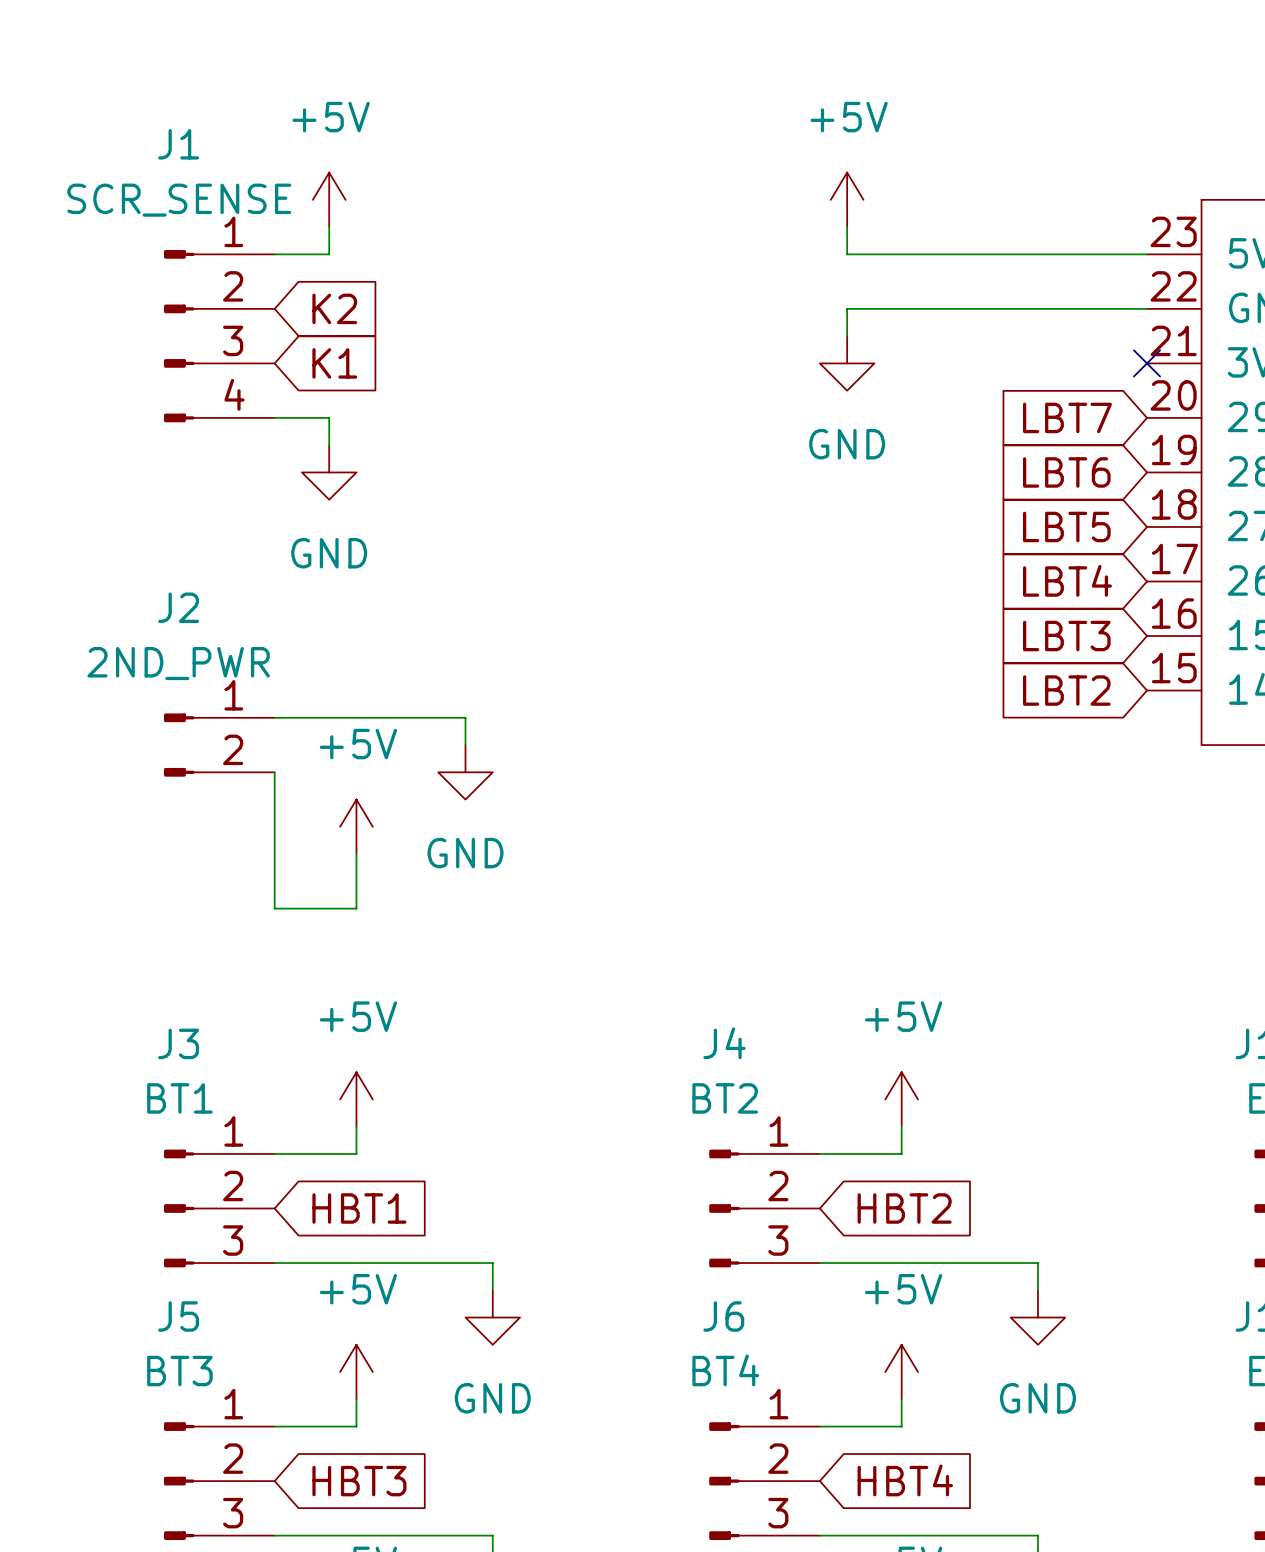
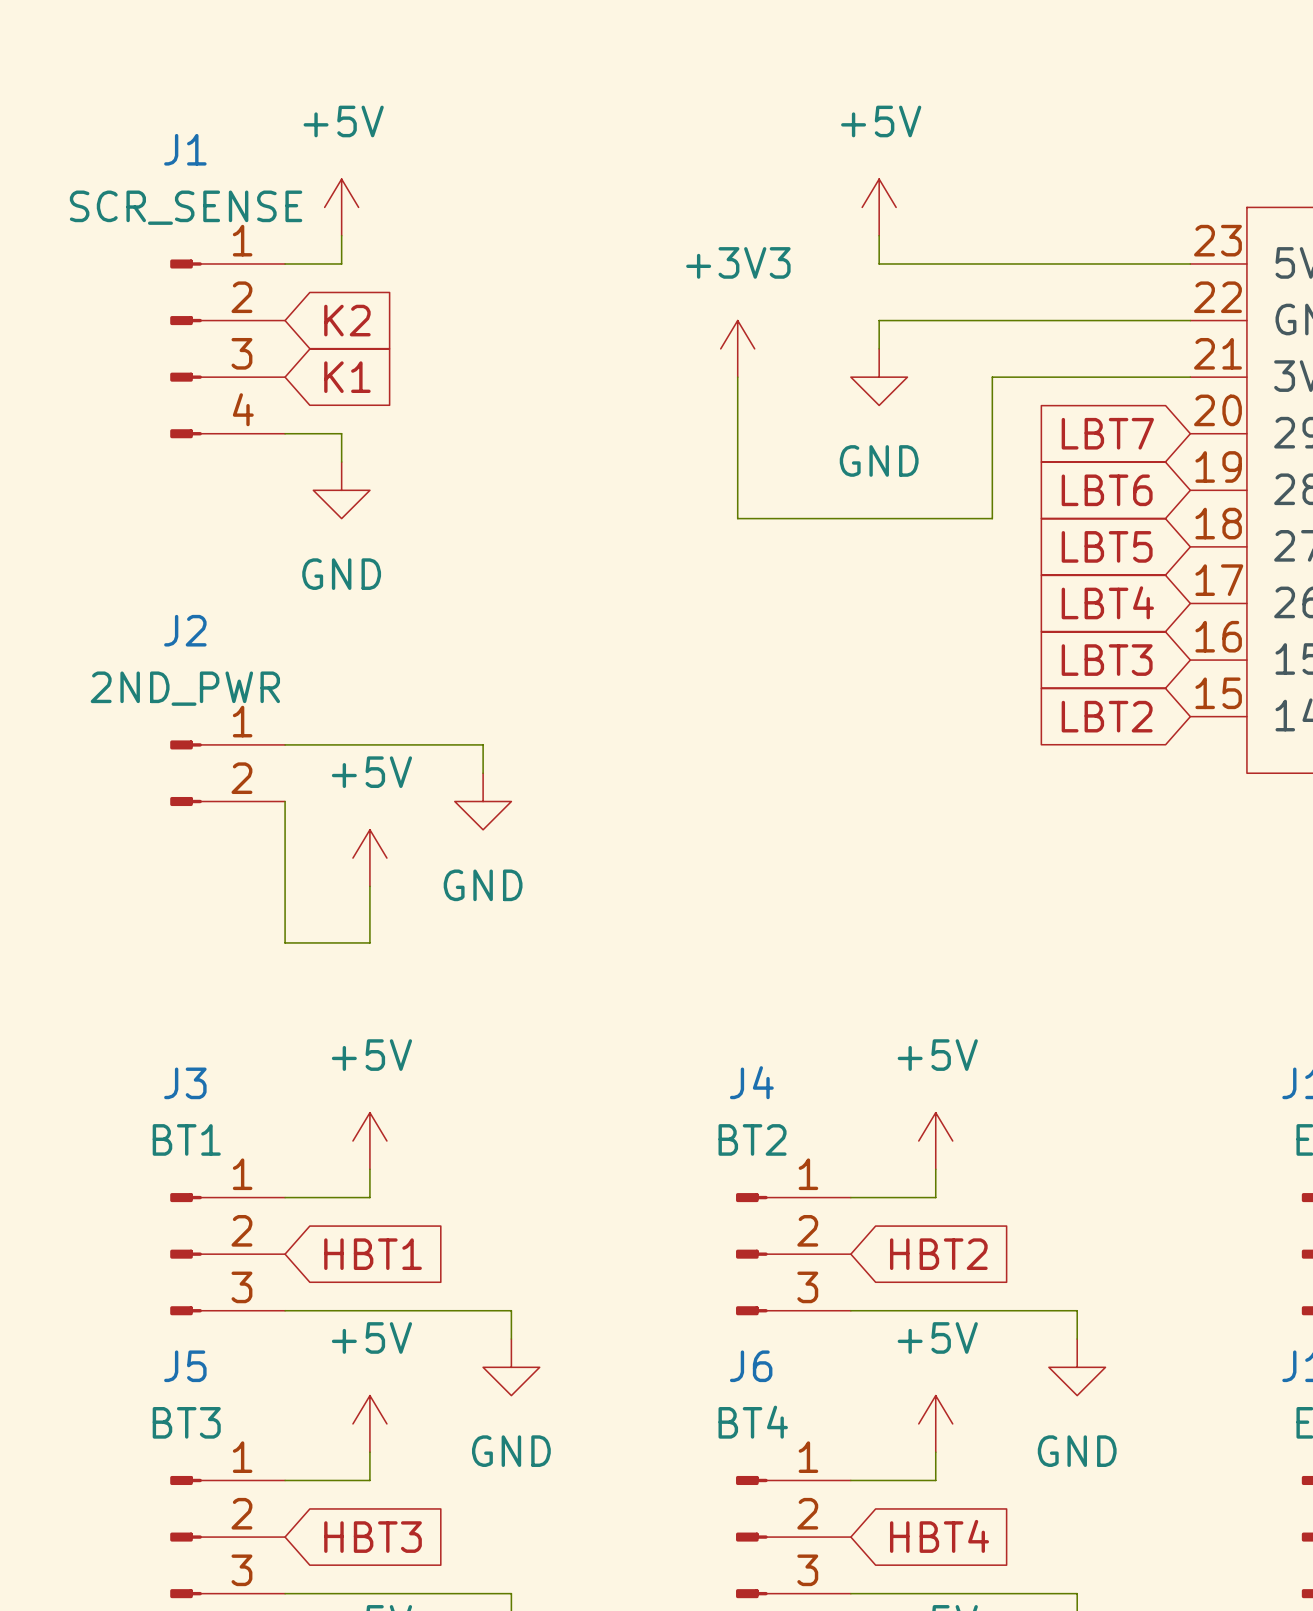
power symbol: none -> +3V3 (737, 348)
wire: none -> (737, 377) (737, 518) (992, 518) (992, 377) (1190, 377)
no-connect mark: (1147, 363) -> none

